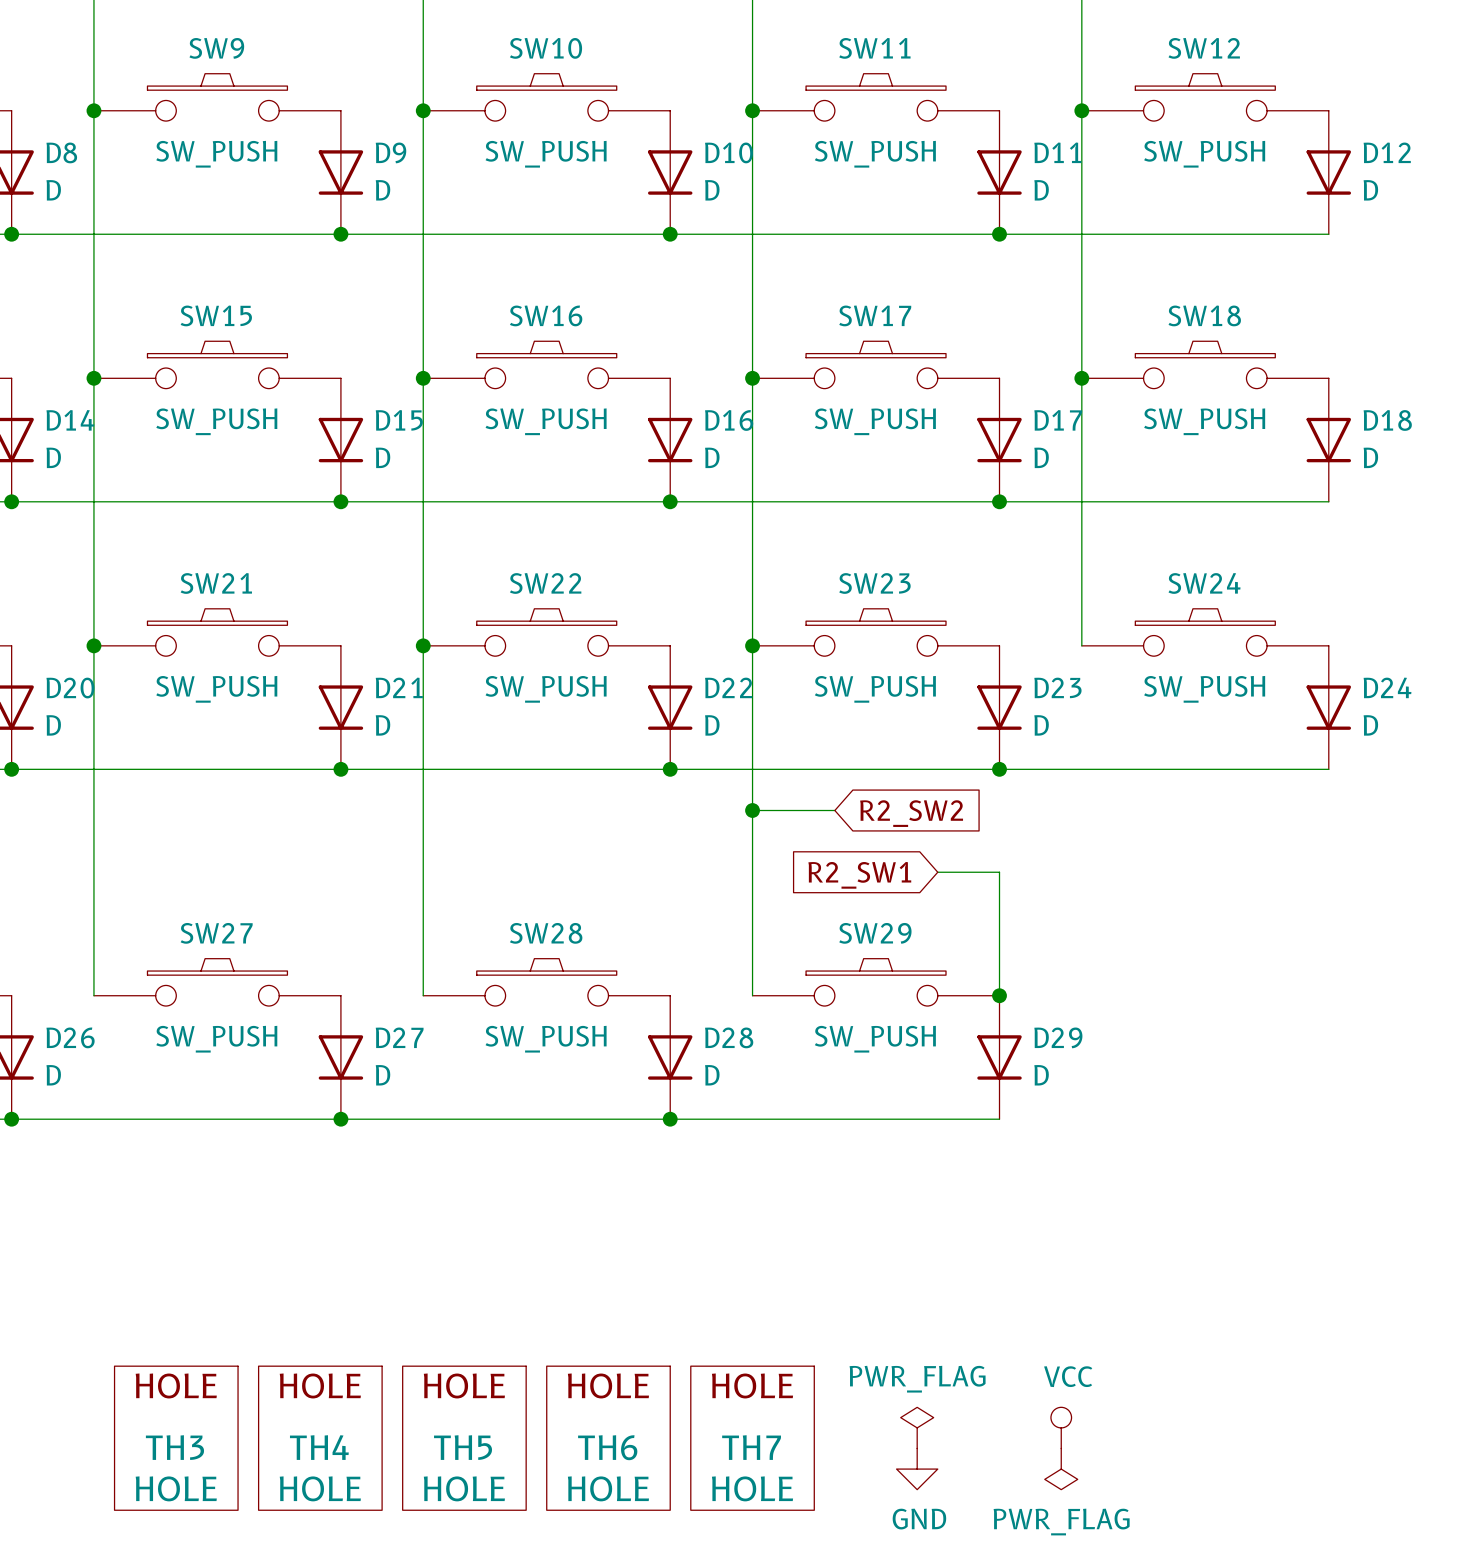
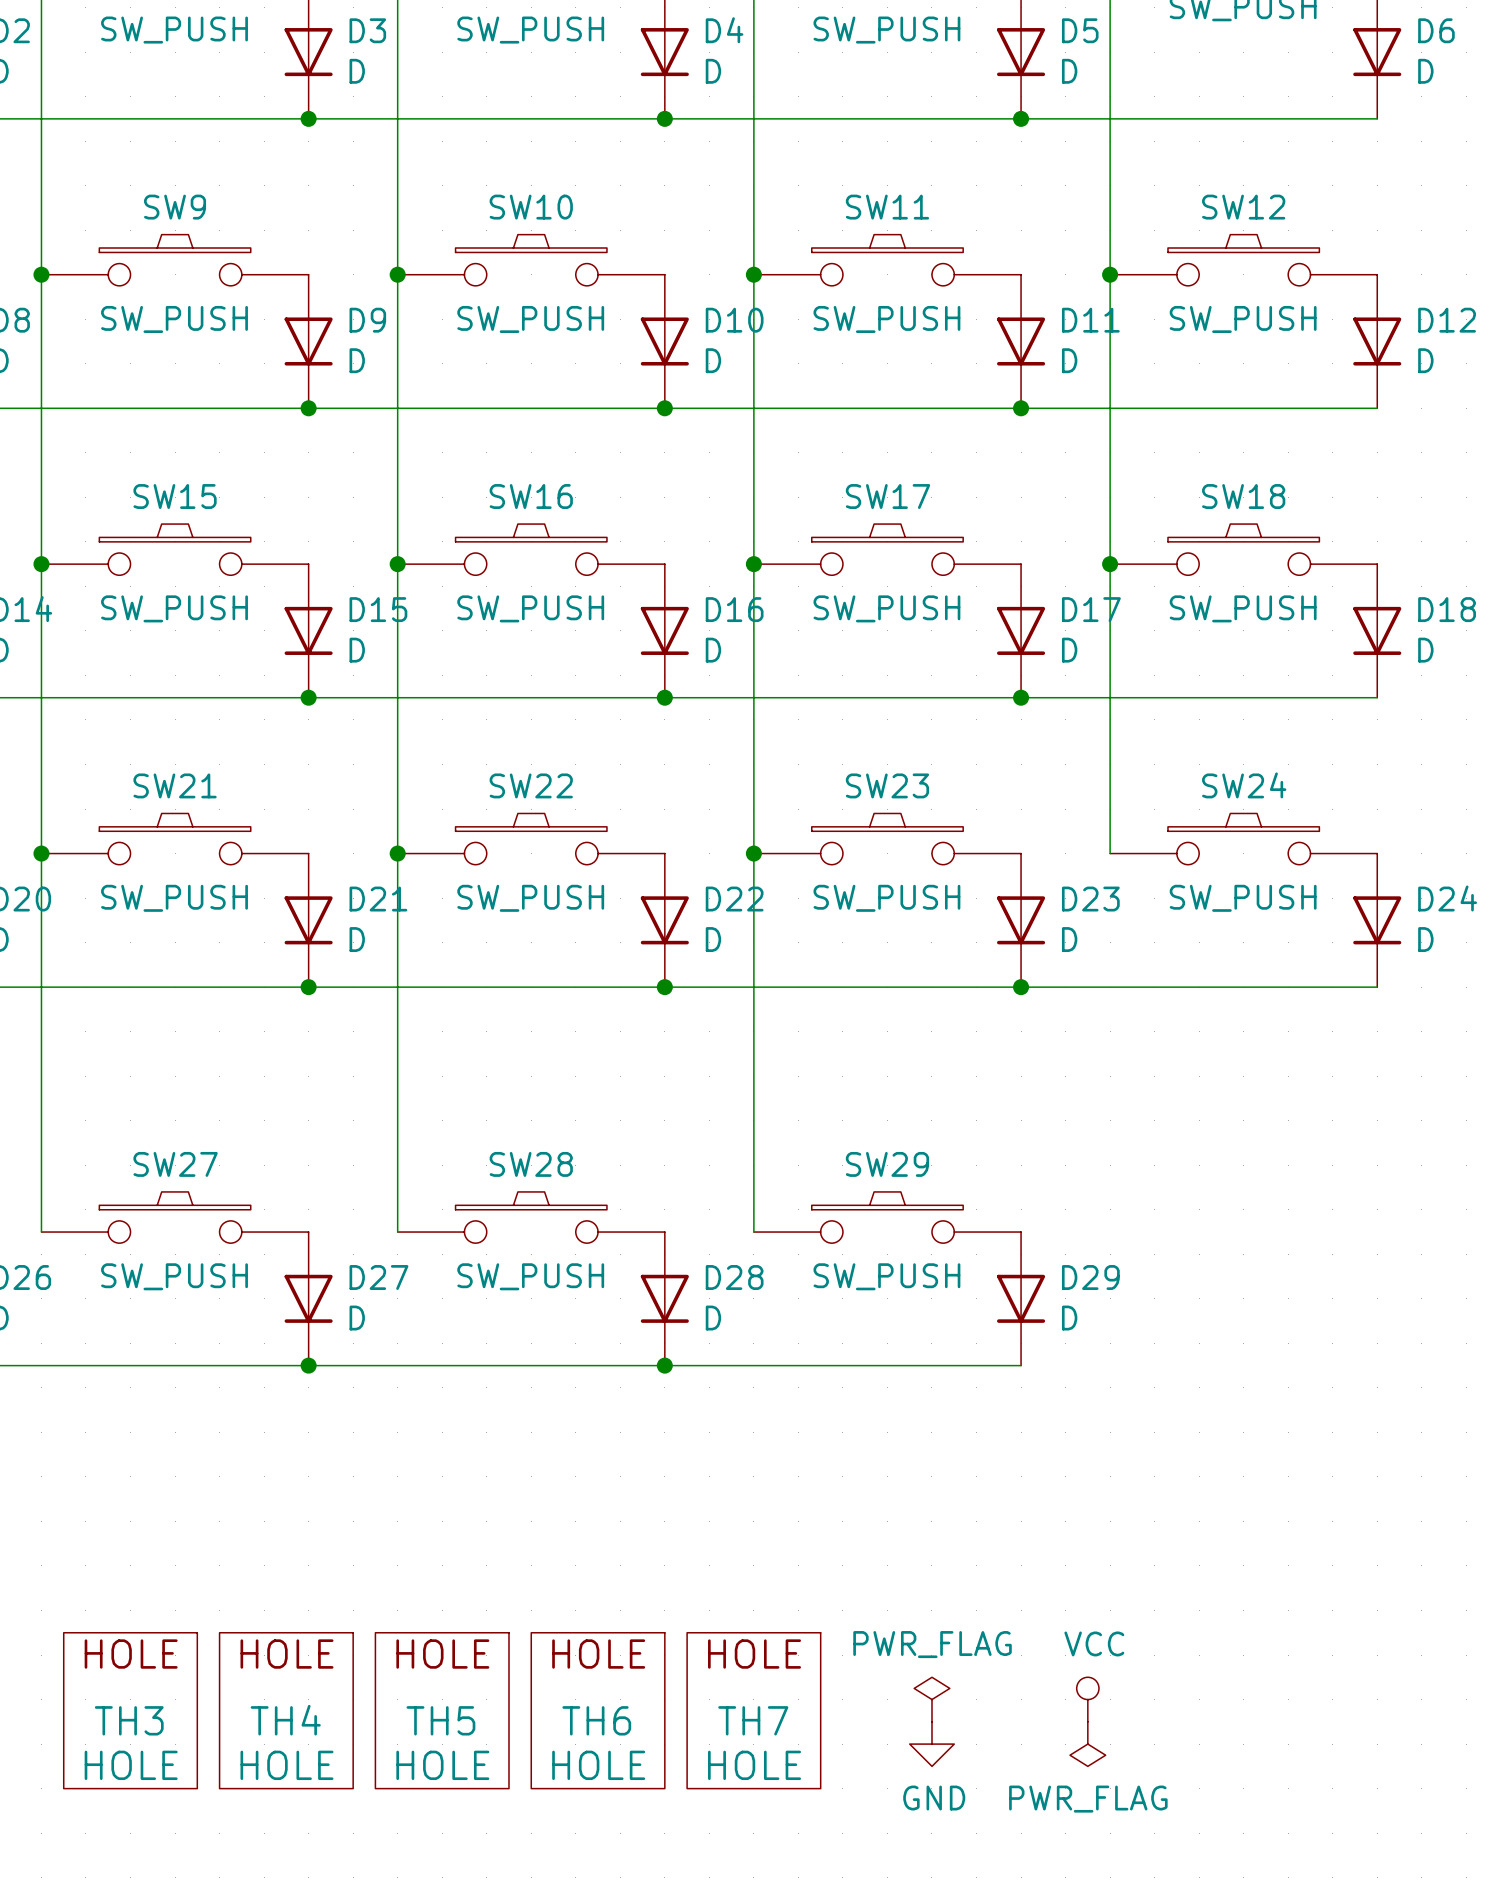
wire: (752, 810) (834, 810) -> none
junction: (752, 810) -> none
global label: R2_SW2 (911, 813) -> none
wire: (937, 872) (999, 872) (999, 995) -> none
global label: R2_SW1 (859, 875) -> none
junction: (999, 995) -> none

